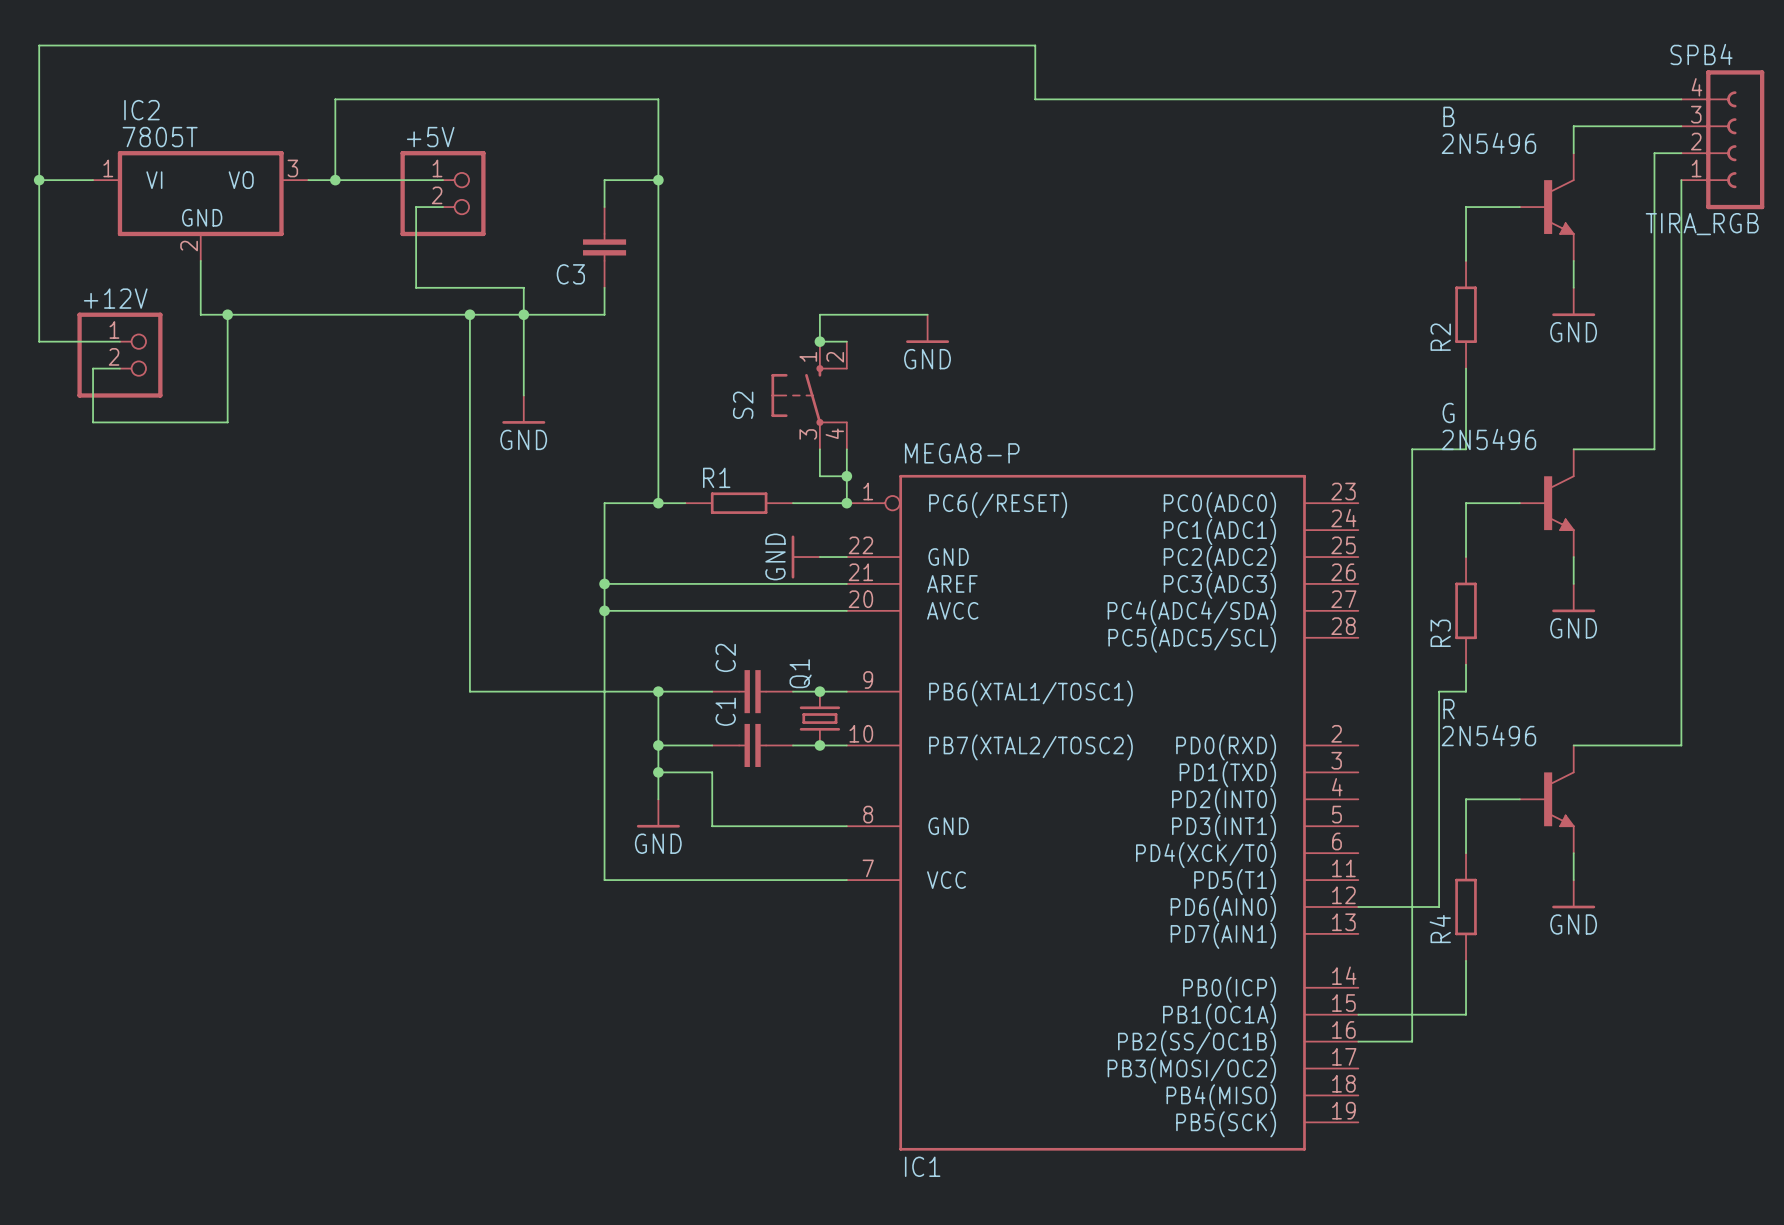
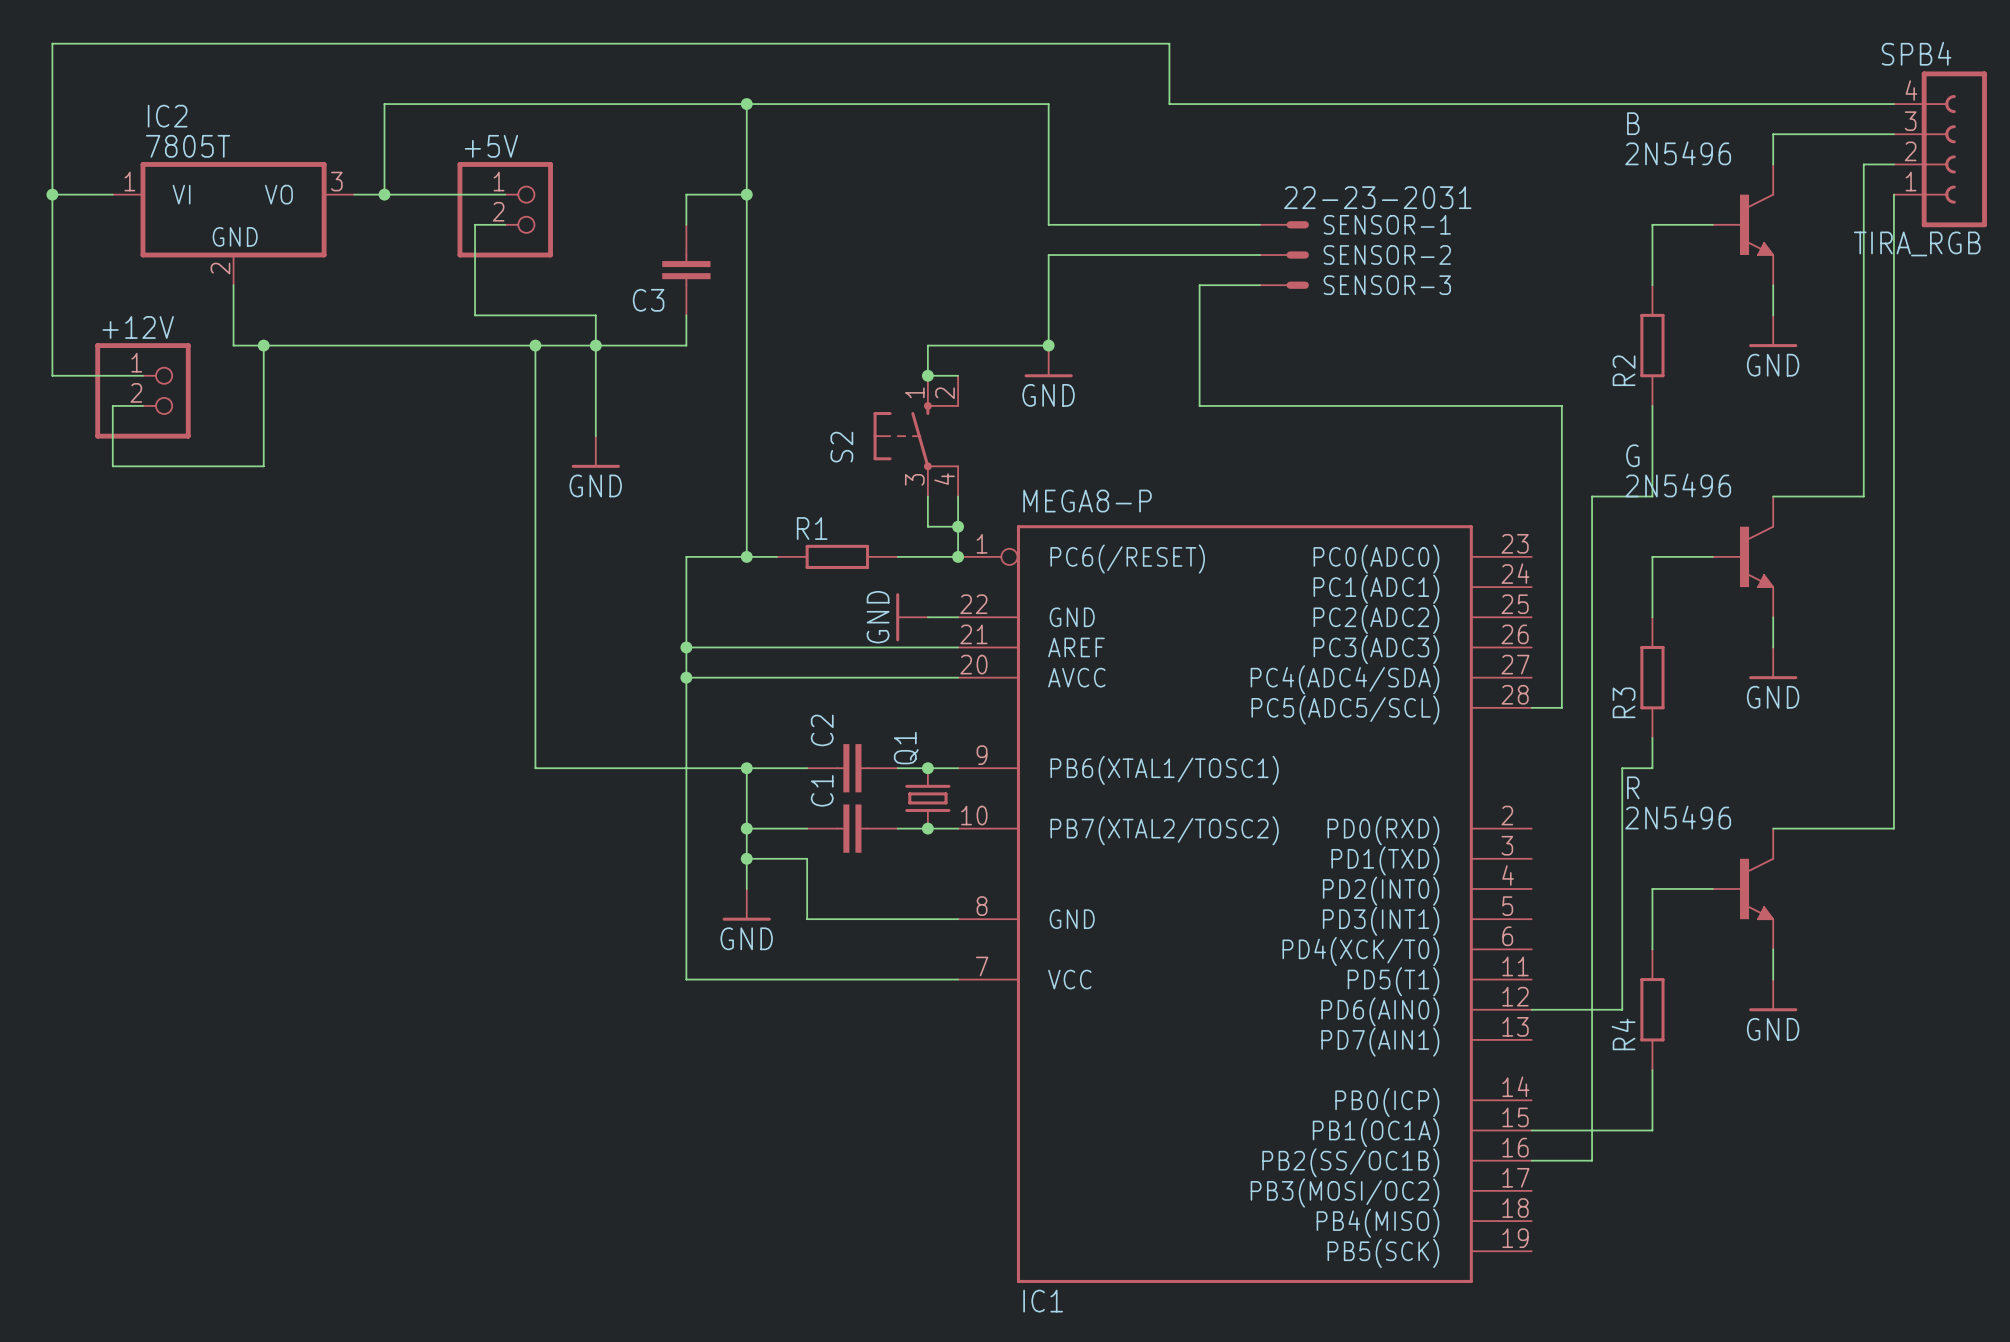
wire: none -> (746, 104) (1048, 104) (1048, 224) (1259, 224)
junction: none -> (746, 104)
SENSOR-1: none -> 22-23-2031 (1284, 224)
wire: none -> (1259, 255) (1048, 255) (1048, 345)
SENSOR-2: none -> (1284, 255)
wire: none -> (1259, 285) (1199, 285) (1199, 405) (1561, 405) (1561, 707) (1531, 707)
SENSOR-3: none -> (1284, 285)
junction: none -> (1048, 345)

